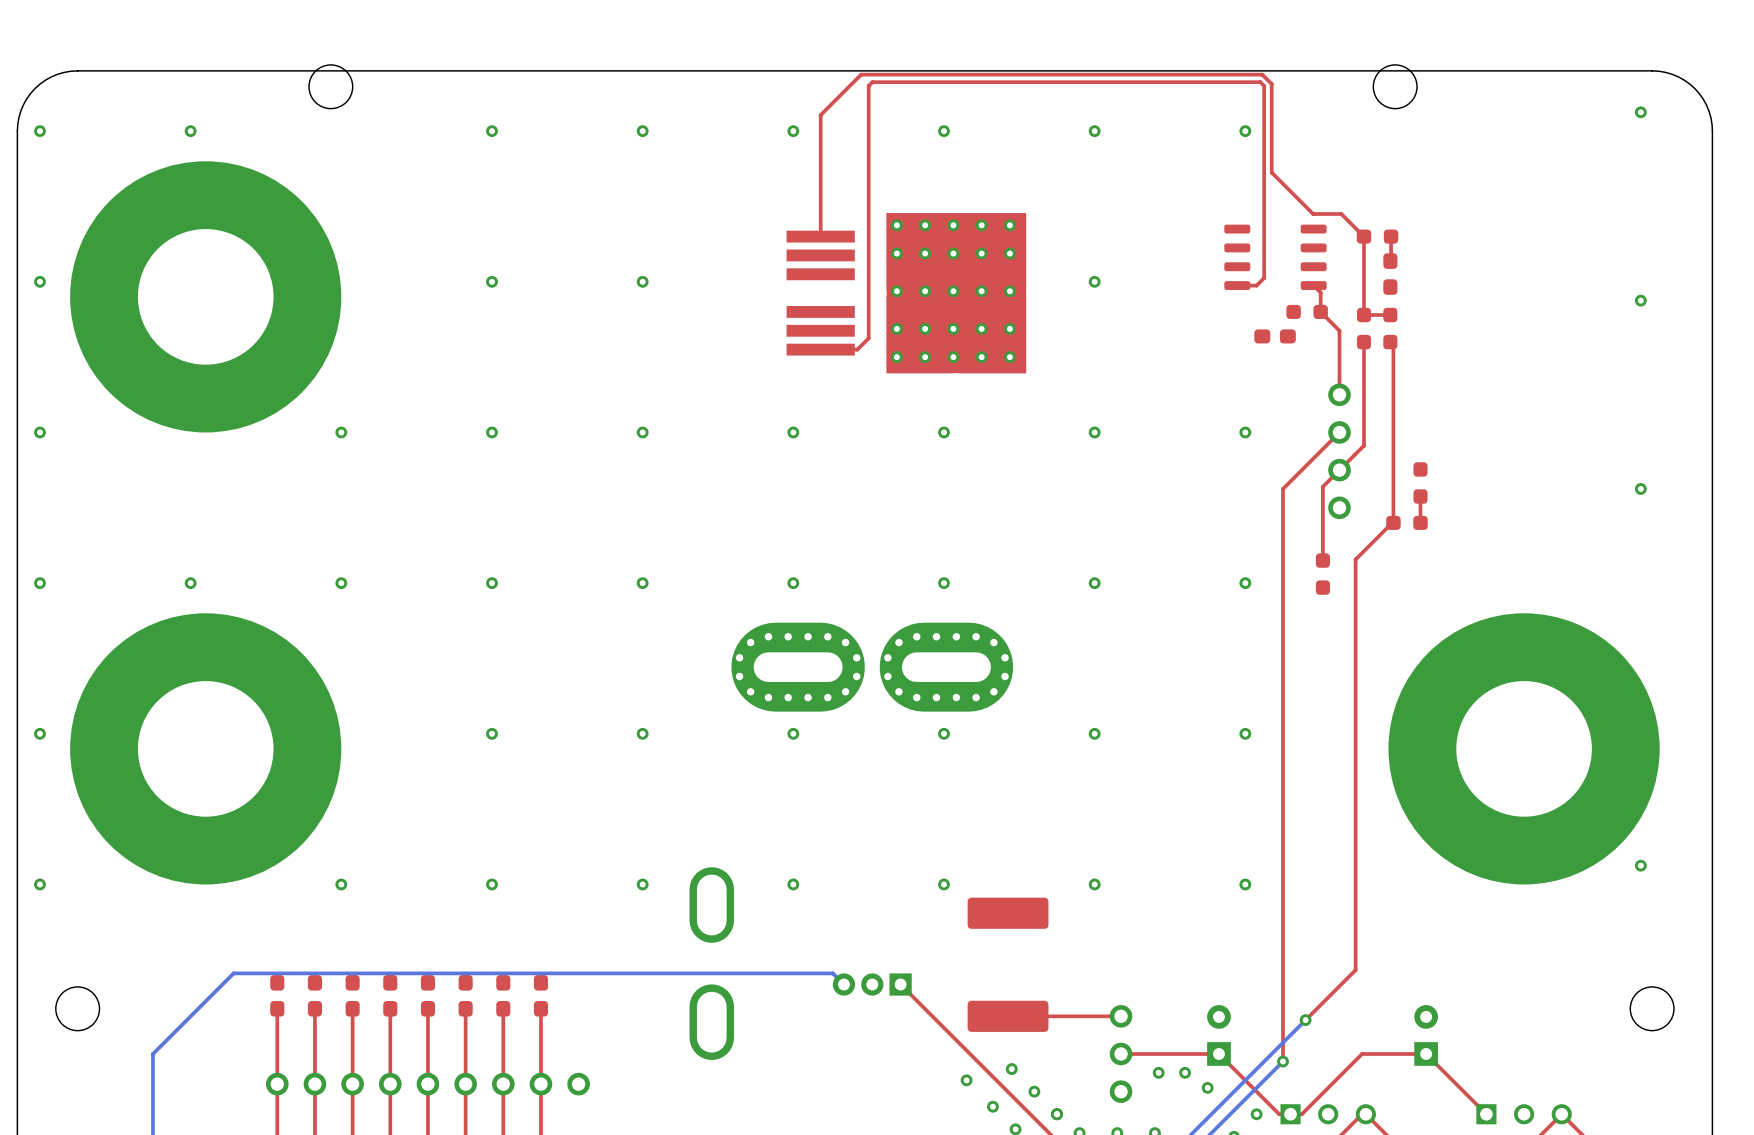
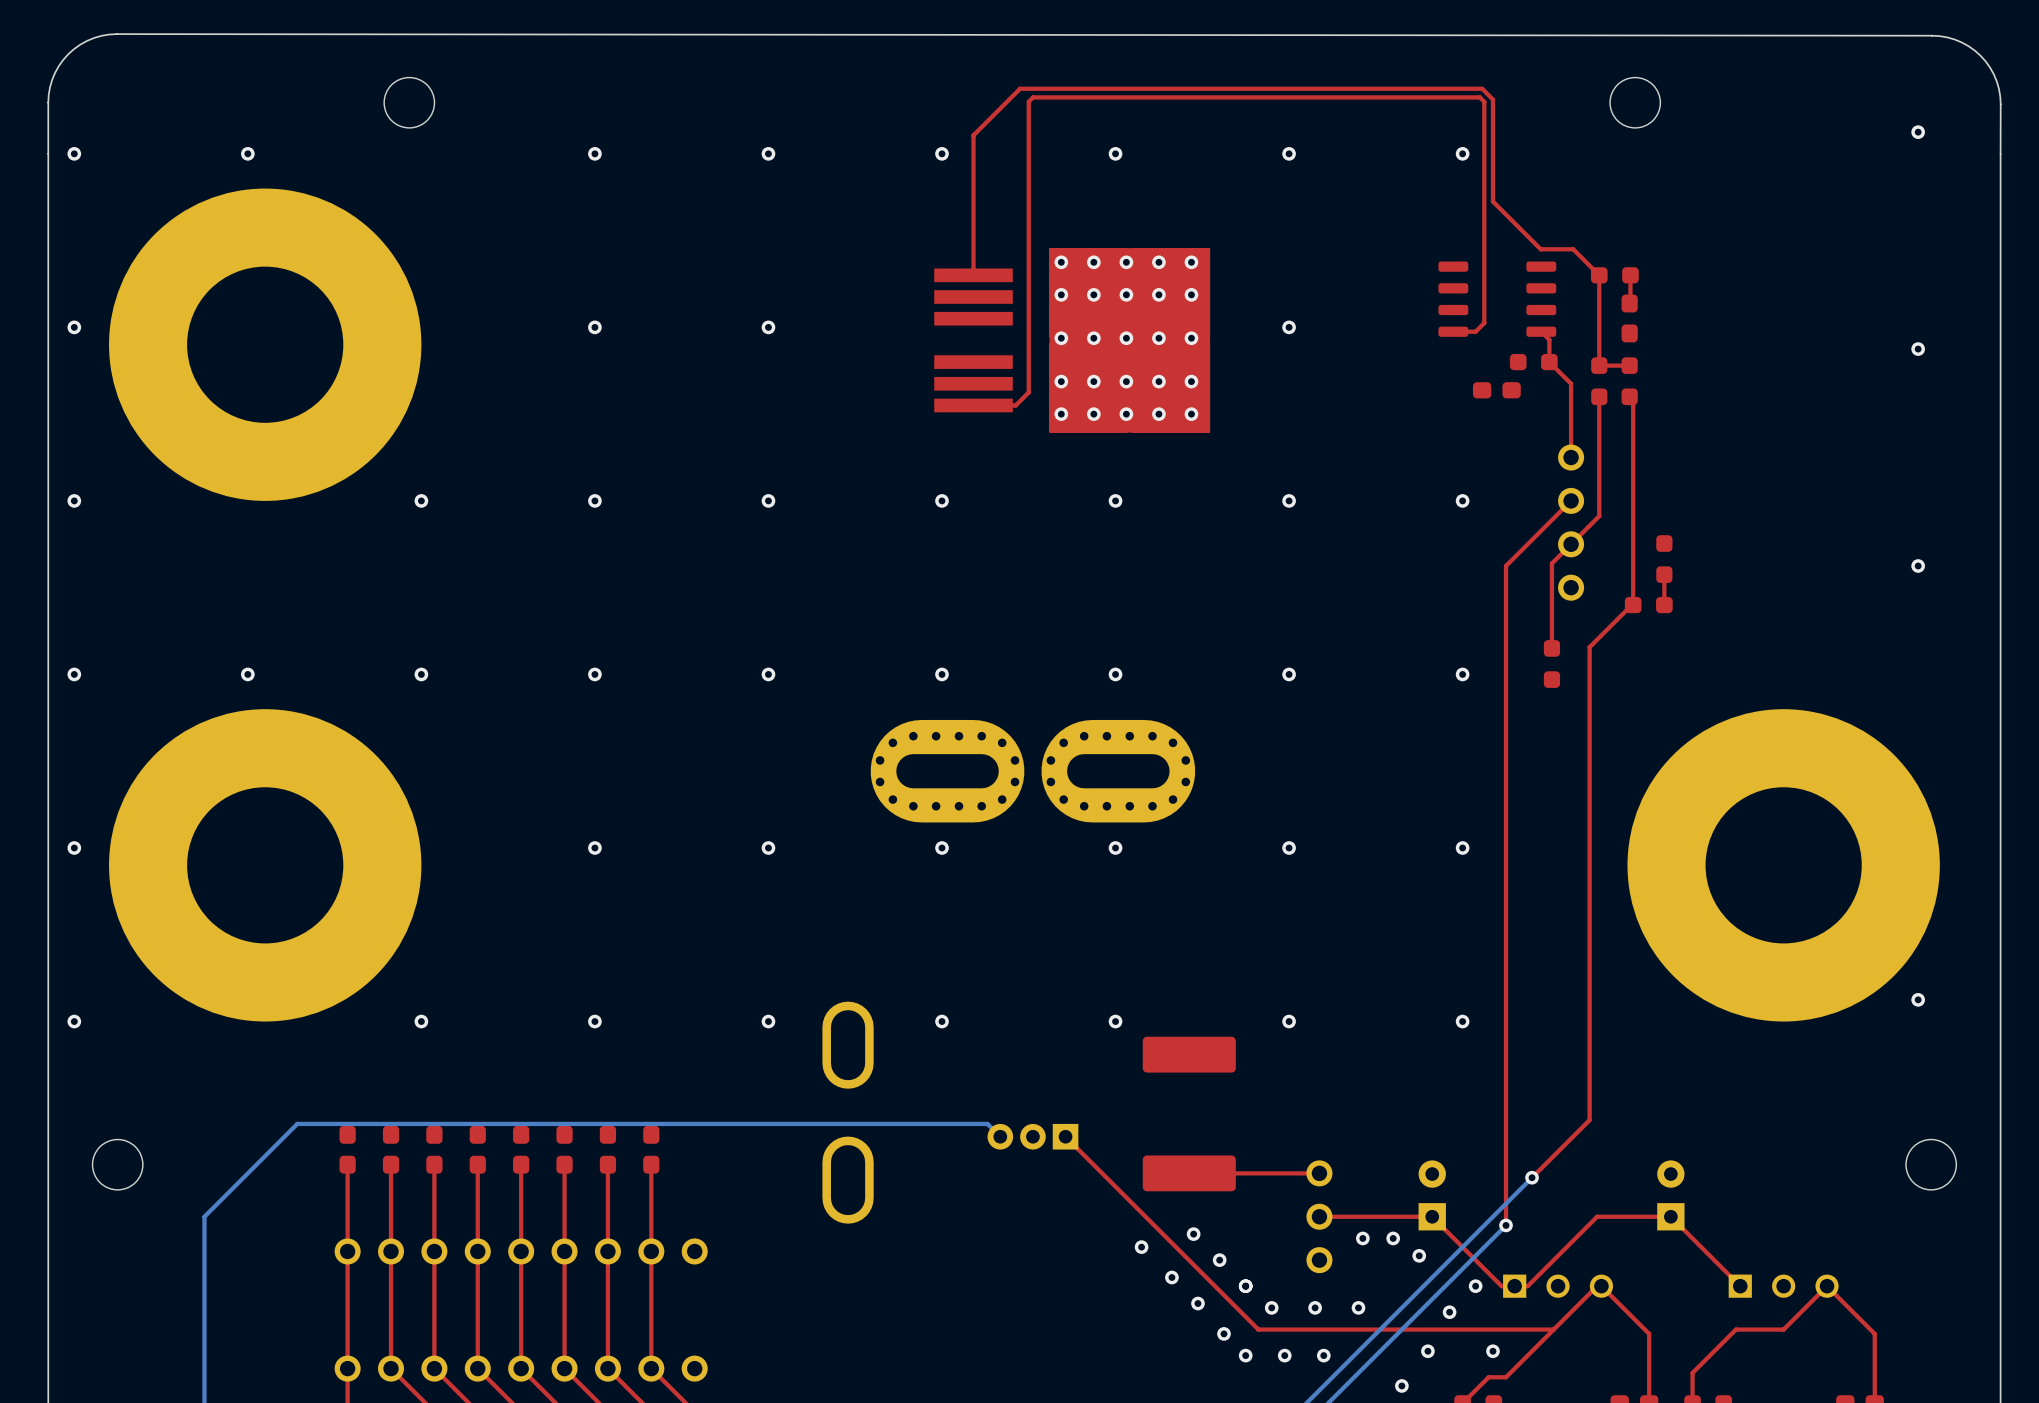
board edge: (1712, 131) (1710, 117) (1706, 104) (1694, 88) (1678, 76) (1665, 72) (1652, 70) (77, 70) (64, 72) (51, 76) (35, 88) (26, 99) (20, 111) (17, 131) -> (2000, 153) (2000, 96) (1993, 74) (1985, 61) (1974, 50) (1954, 39) (1939, 36) (116, 34) (101, 35) (87, 40) (74, 49) (58, 66) (52, 80) (48, 94) (48, 153)

